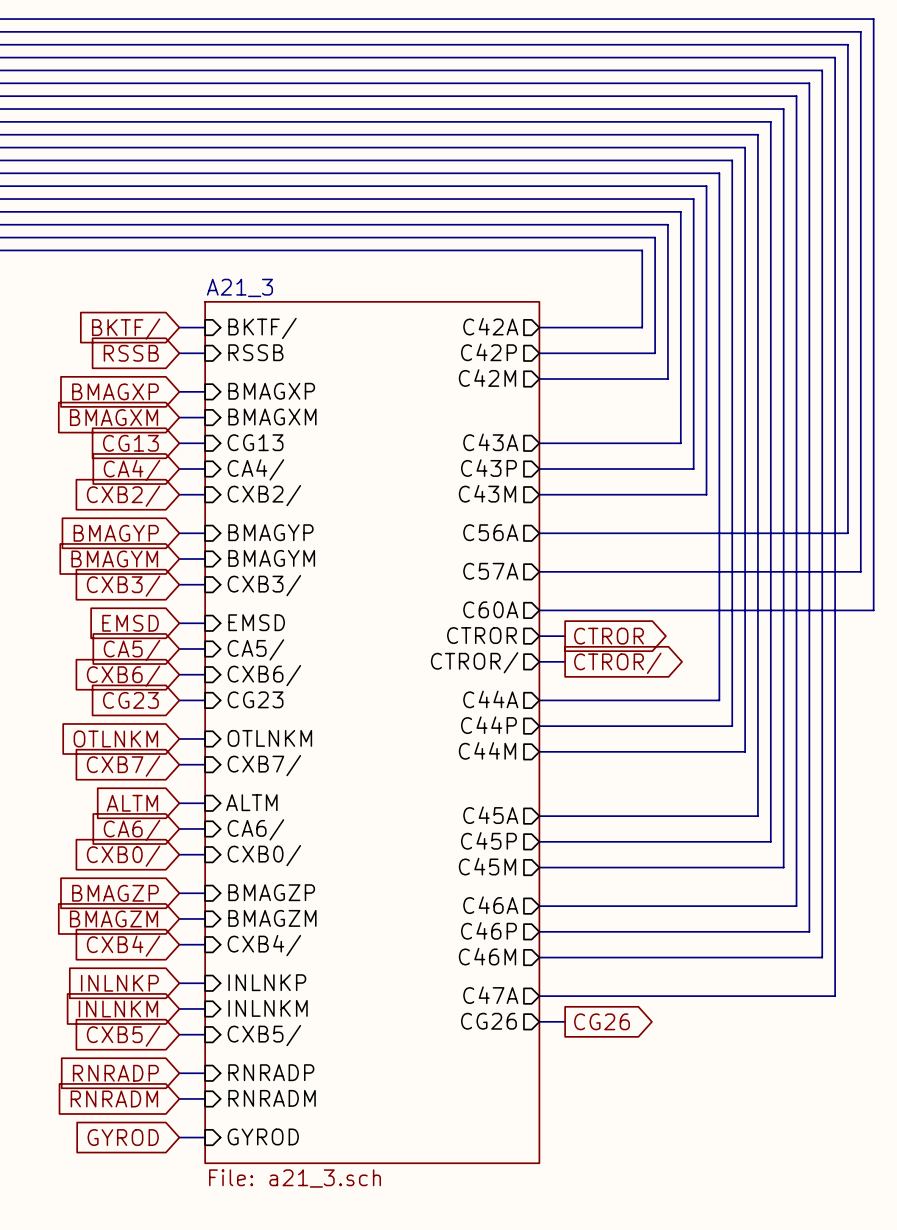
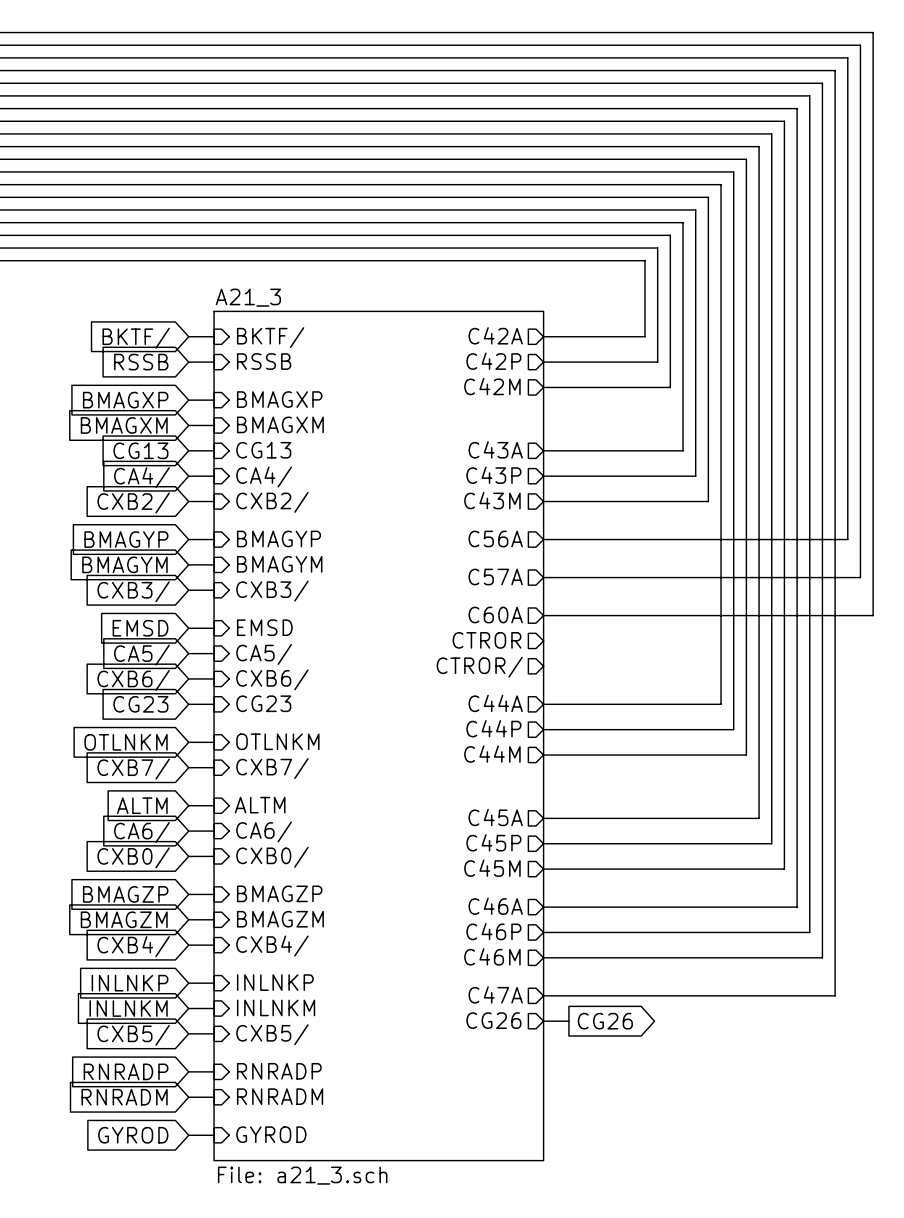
wire: (539, 636) (565, 636) -> none
global label: CTROR (609, 636) -> none
wire: (539, 661) (565, 661) -> none
global label: CTROR/ (617, 663) -> none

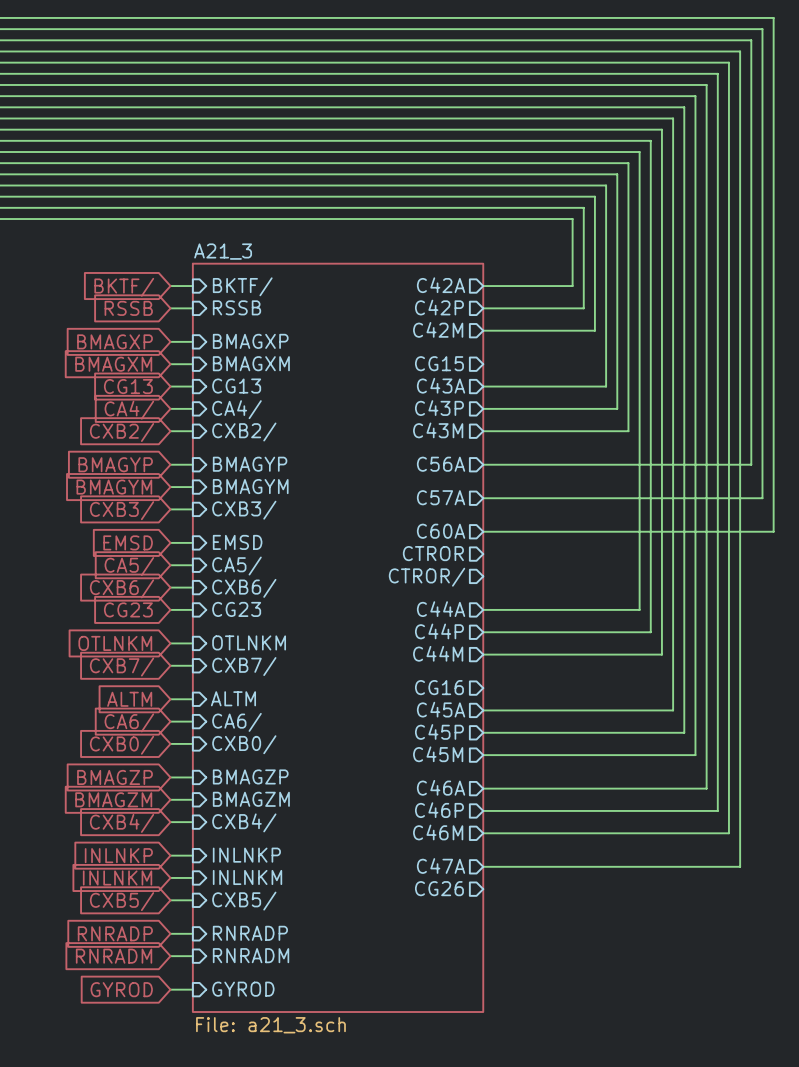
sheet pin: none -> CG15 (439, 363)
sheet pin: none -> CG16 (439, 687)
wire: (543, 1021) (568, 1021) -> none
global label: CG26 (605, 1021) -> none

